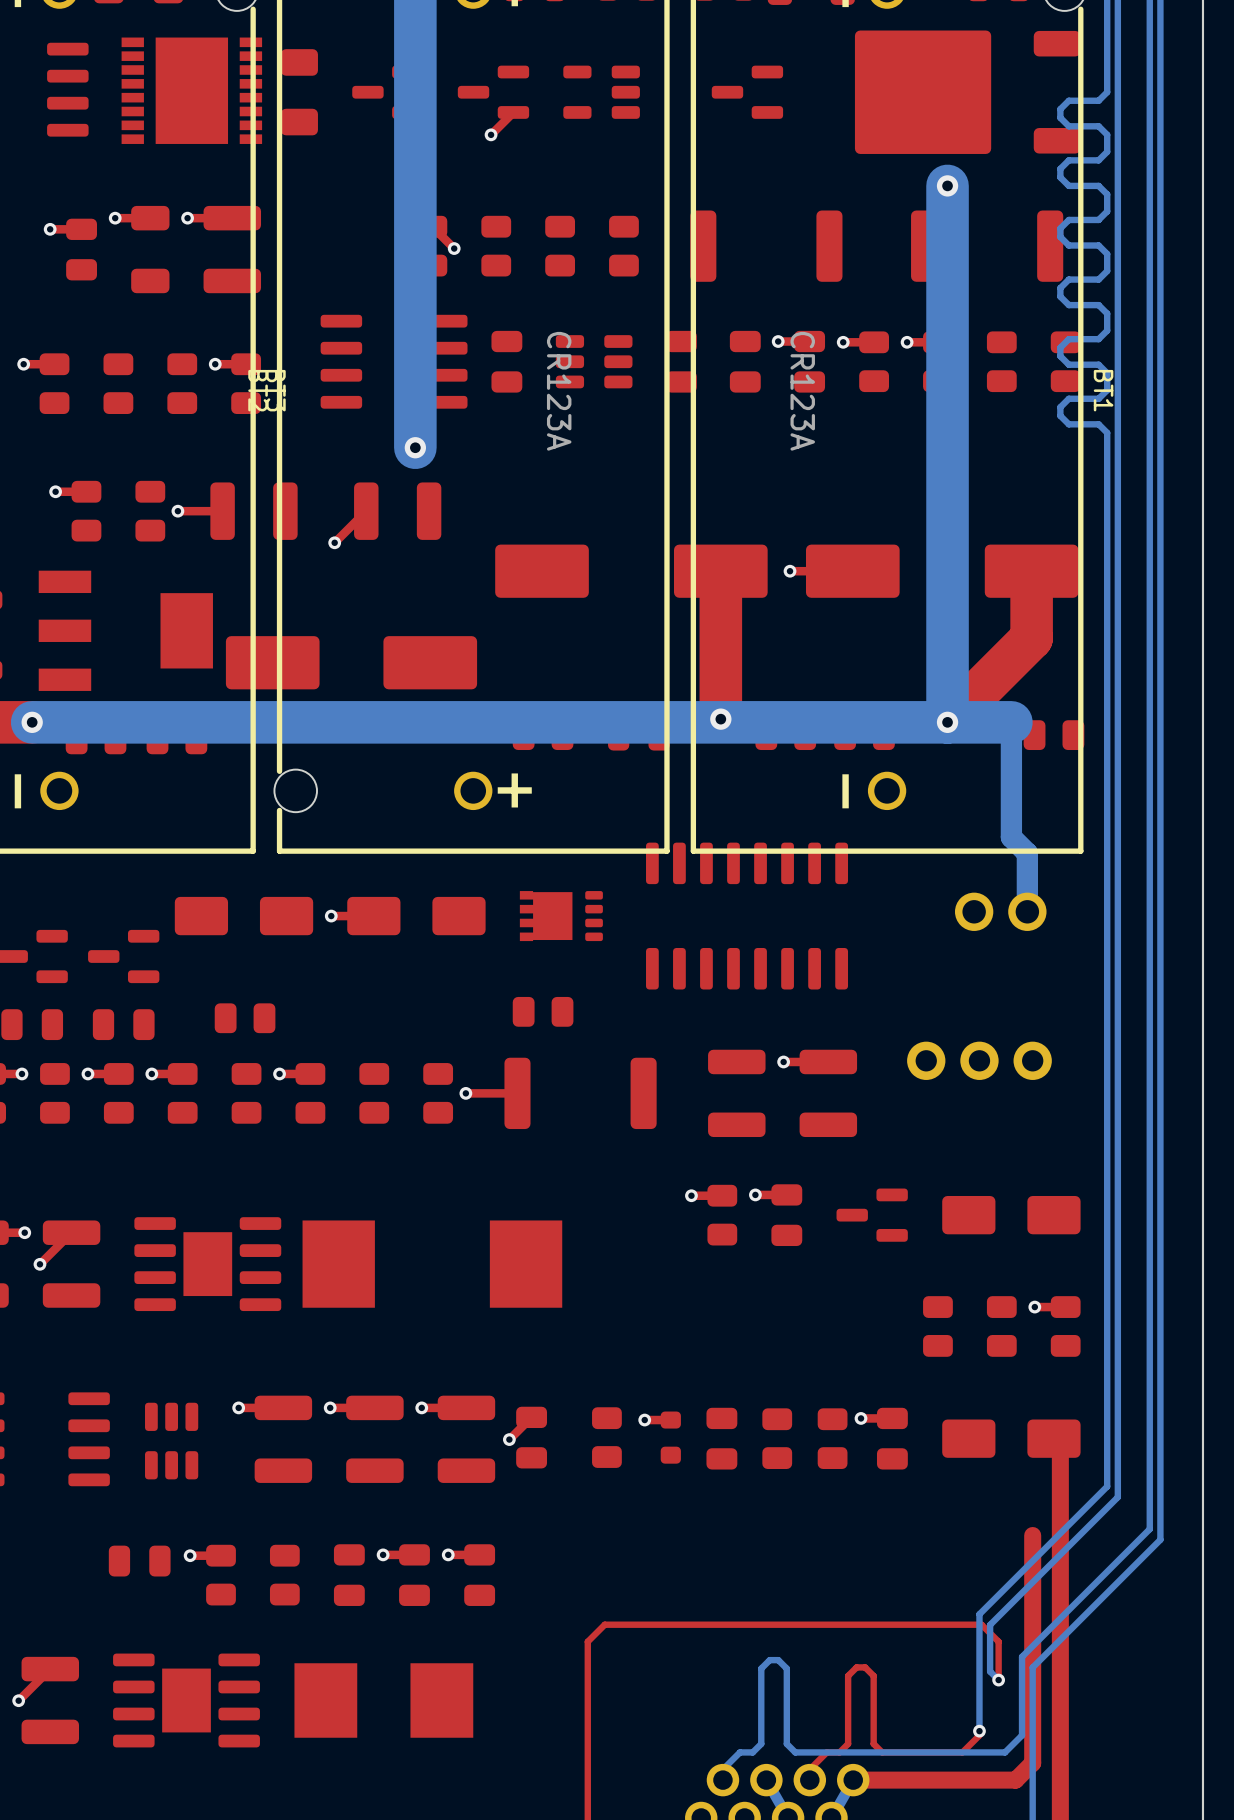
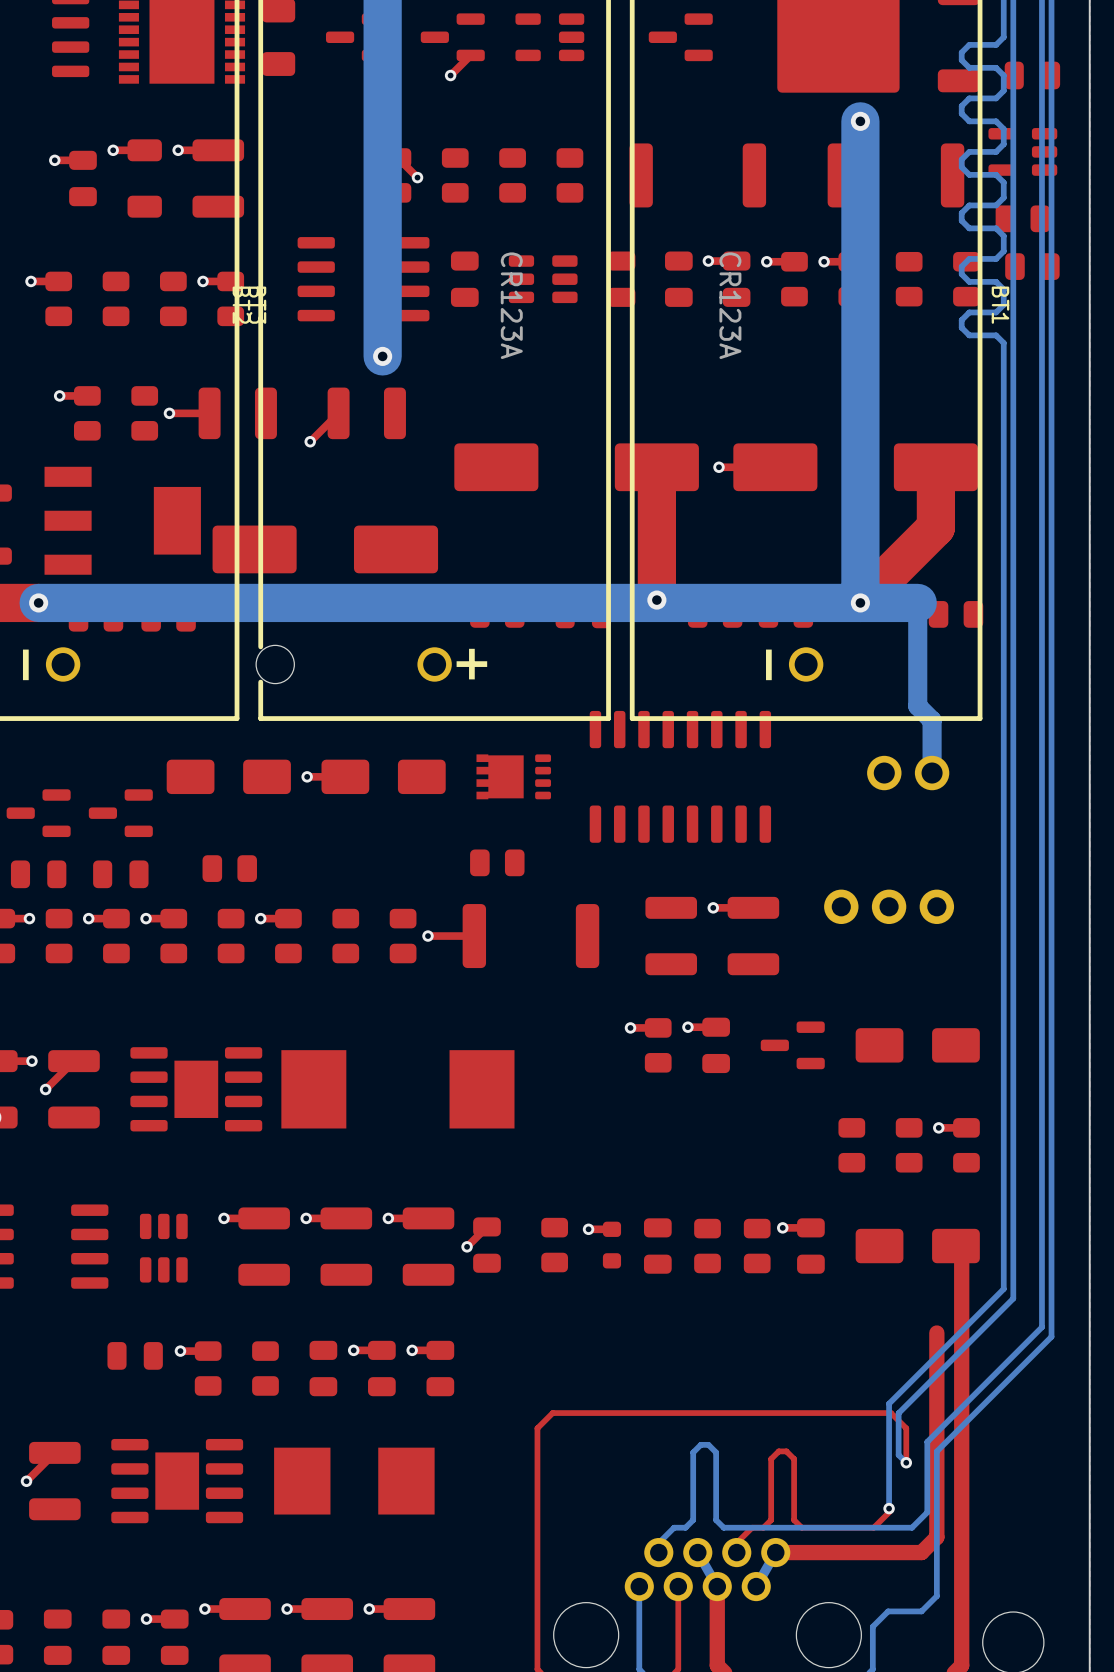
part: none -> (1032, 75)
part: none -> (1022, 151)
part: none -> (1022, 218)
part: none -> (1032, 266)

